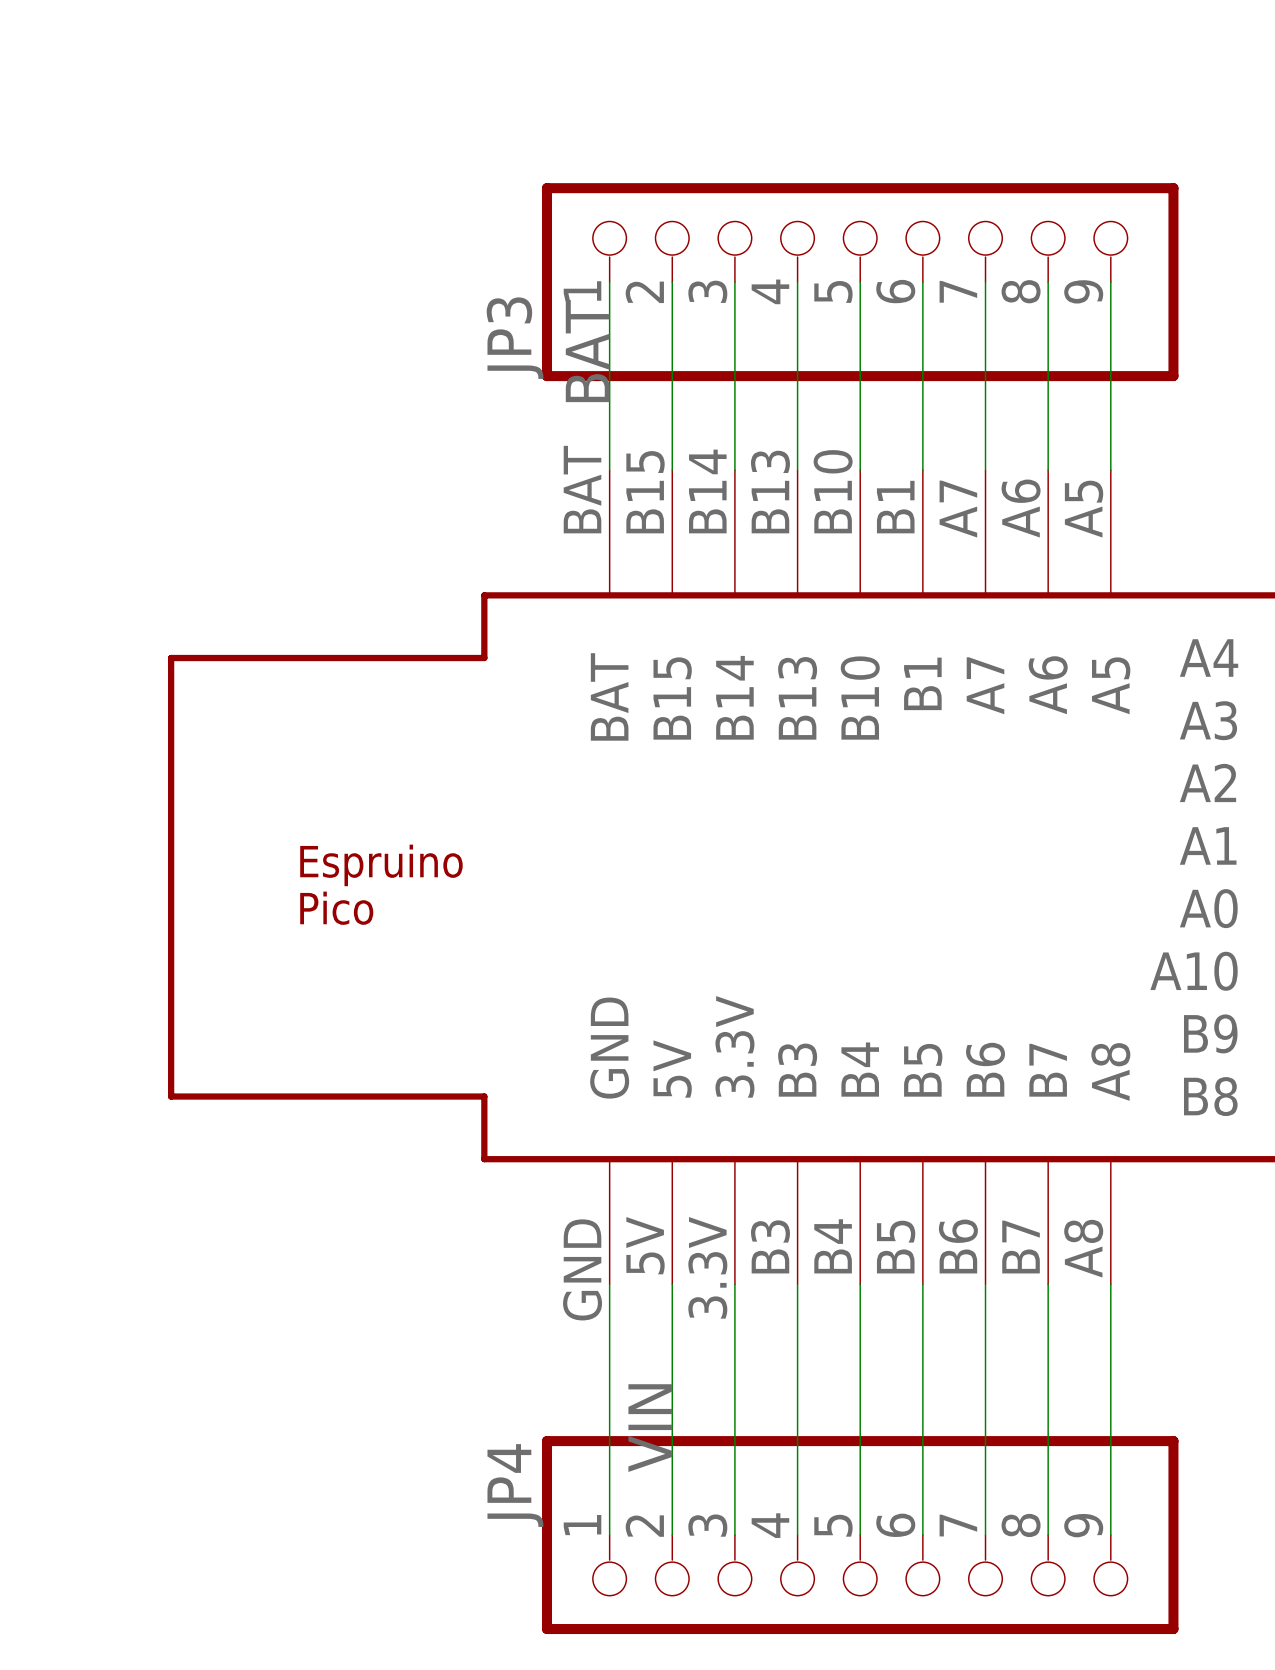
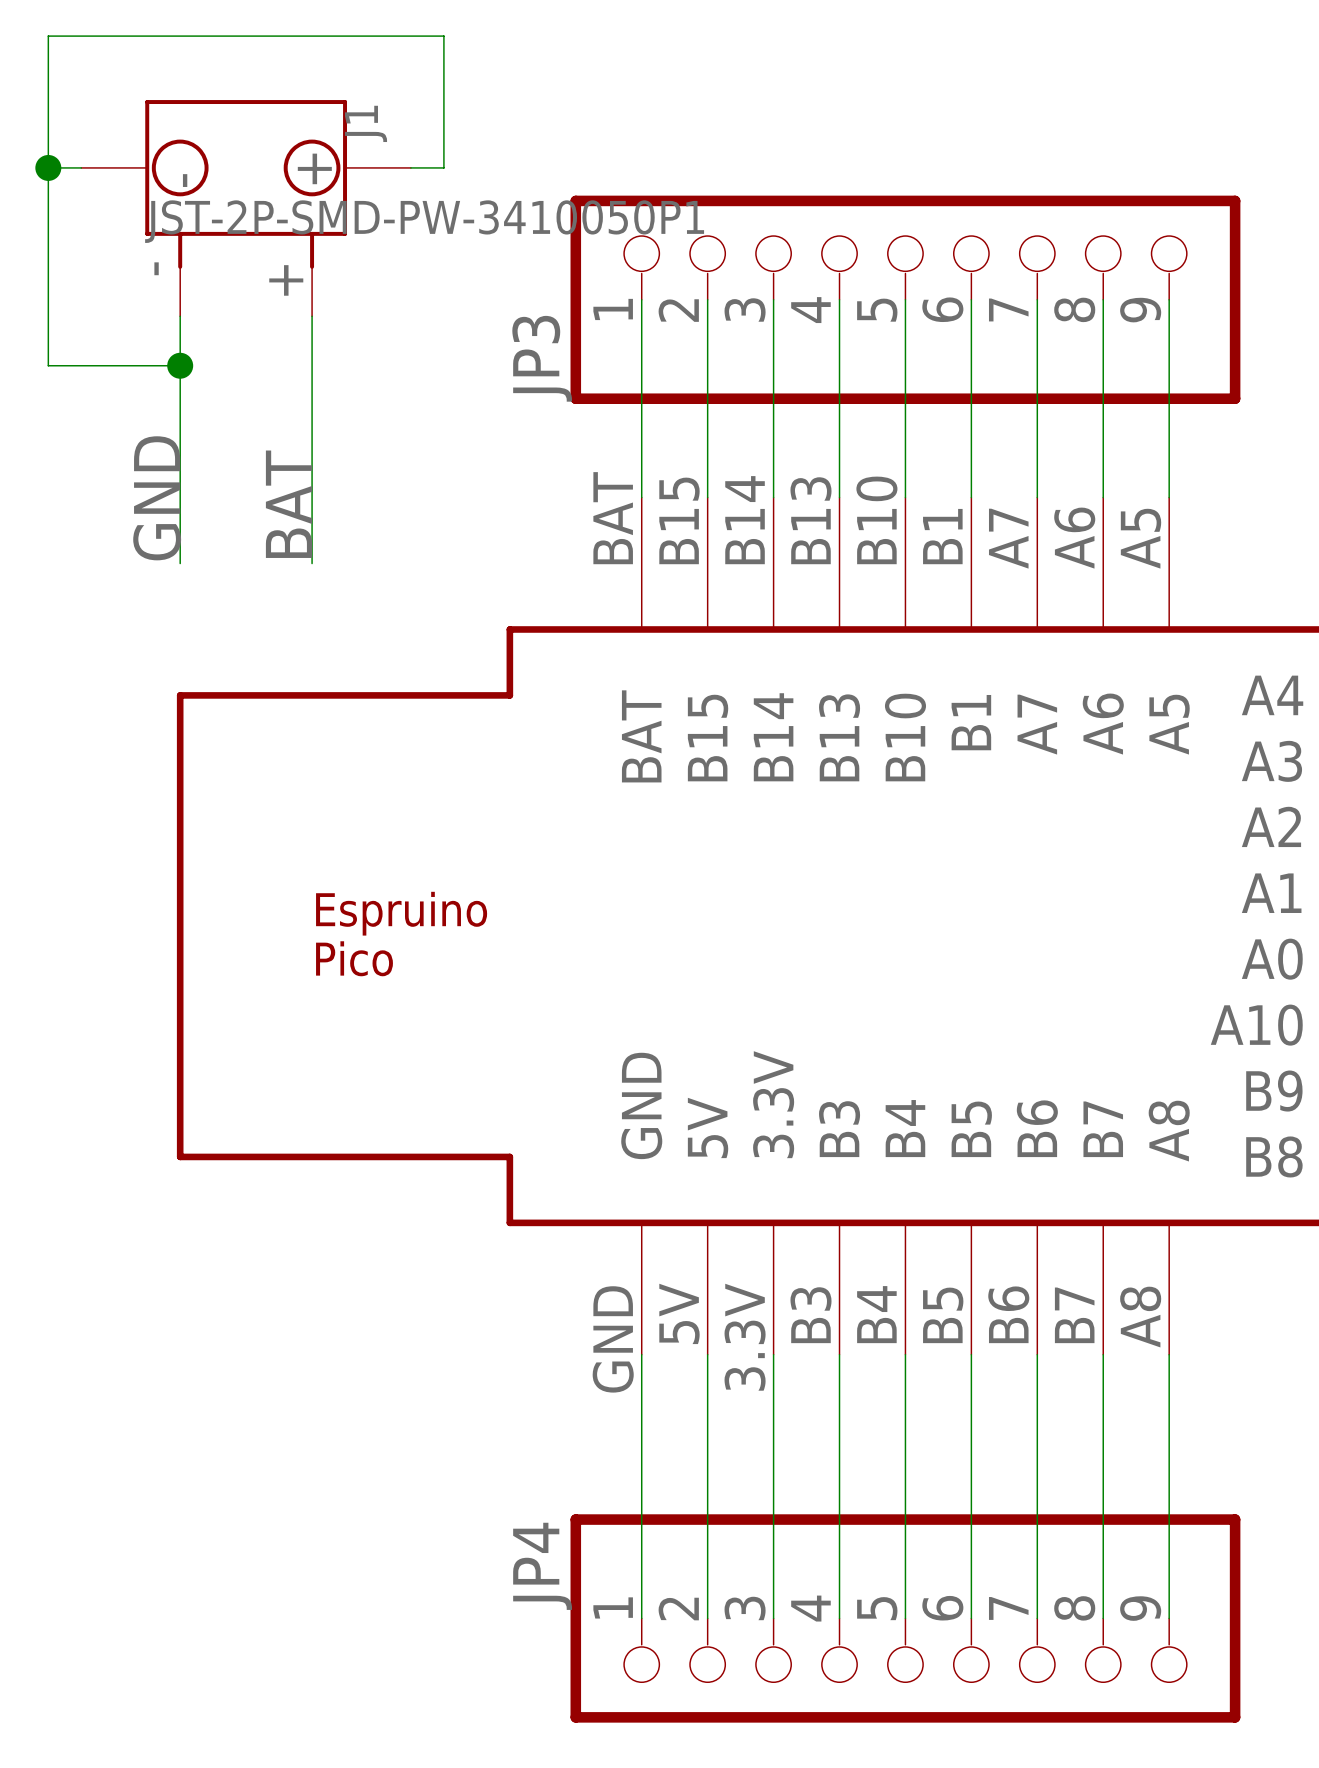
wire: none -> (48, 167) (81, 167)
junction: none -> (48, 167)
wire: none -> (410, 167) (443, 167) (443, 36) (48, 36) (48, 365) (180, 365)
J1: none -> JST-2P-SMD-PW-3410050P1 (246, 208)
wire: none -> (180, 316) (180, 563)
wire: none -> (312, 316) (312, 563)
junction: none -> (180, 365)
label position: BAT (587, 351) -> BAT (288, 504)
label: none -> GND (157, 498)
label: VIN (650, 1428) -> none

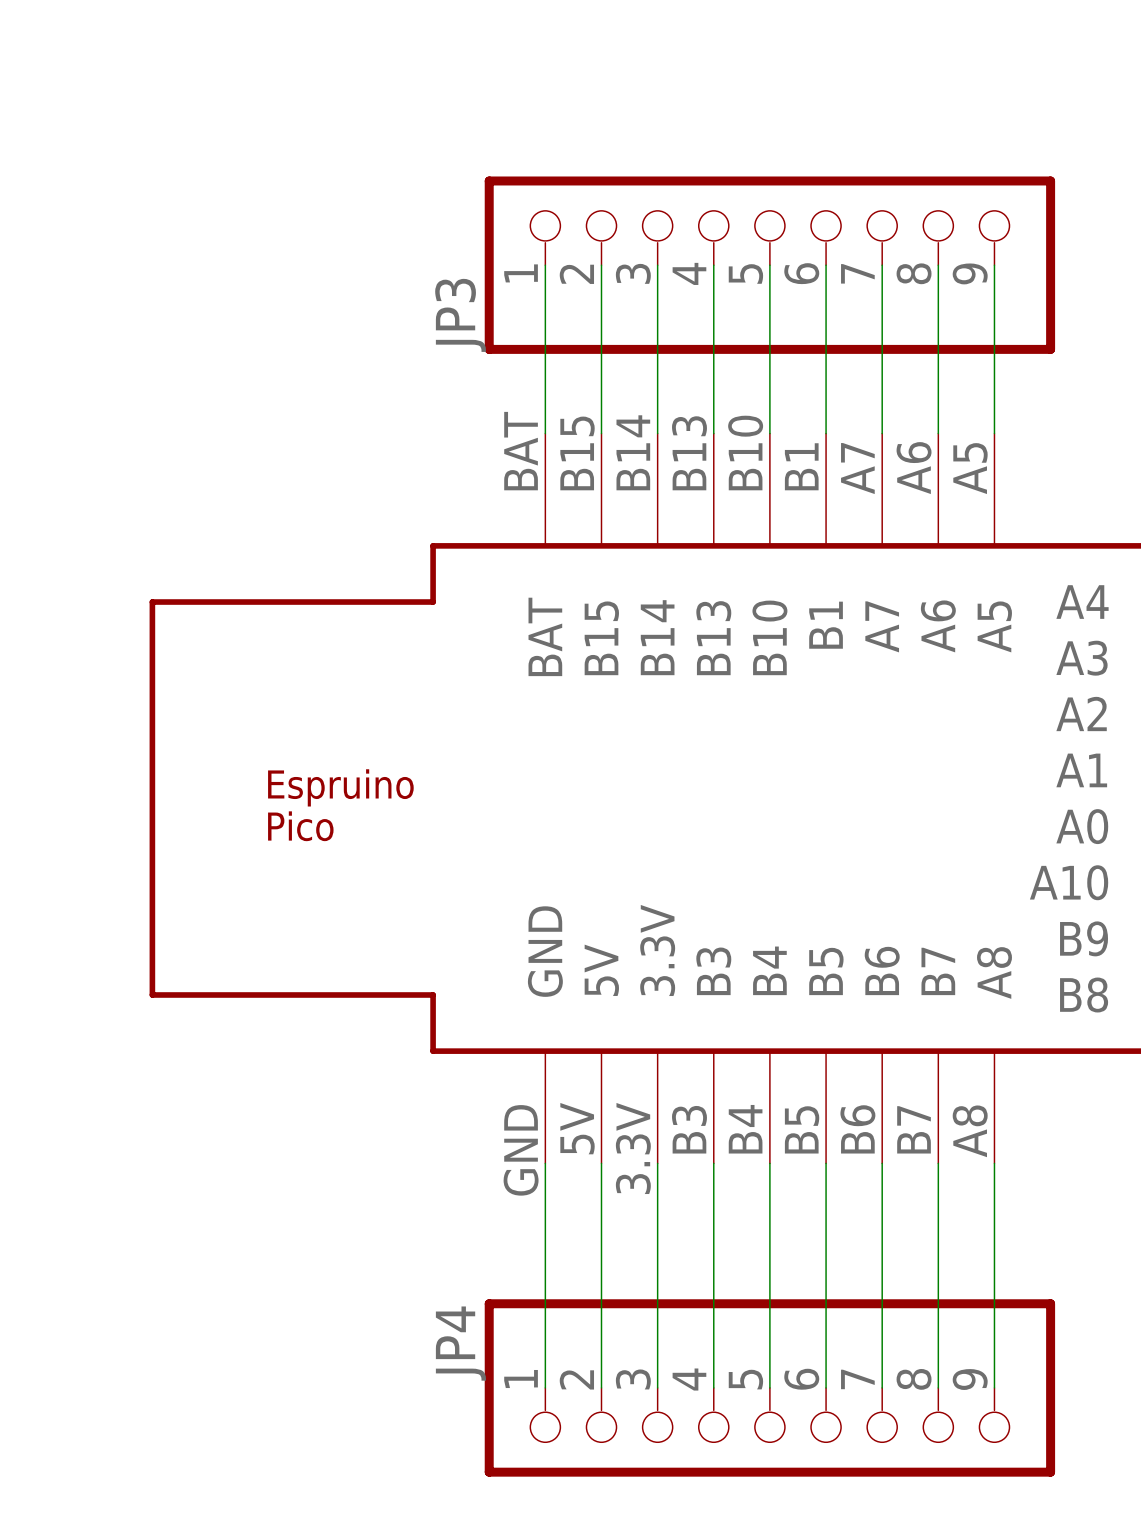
wire: (48, 167) (81, 167) -> none
junction: (48, 167) -> none
wire: (410, 167) (443, 167) (443, 36) (48, 36) (48, 365) (180, 365) -> none
J1: JST-2P-SMD-PW-3410050P1 (246, 208) -> none
wire: (180, 316) (180, 563) -> none
wire: (312, 316) (312, 563) -> none
junction: (180, 365) -> none
label: GND (157, 498) -> none
label: BAT (288, 504) -> none

